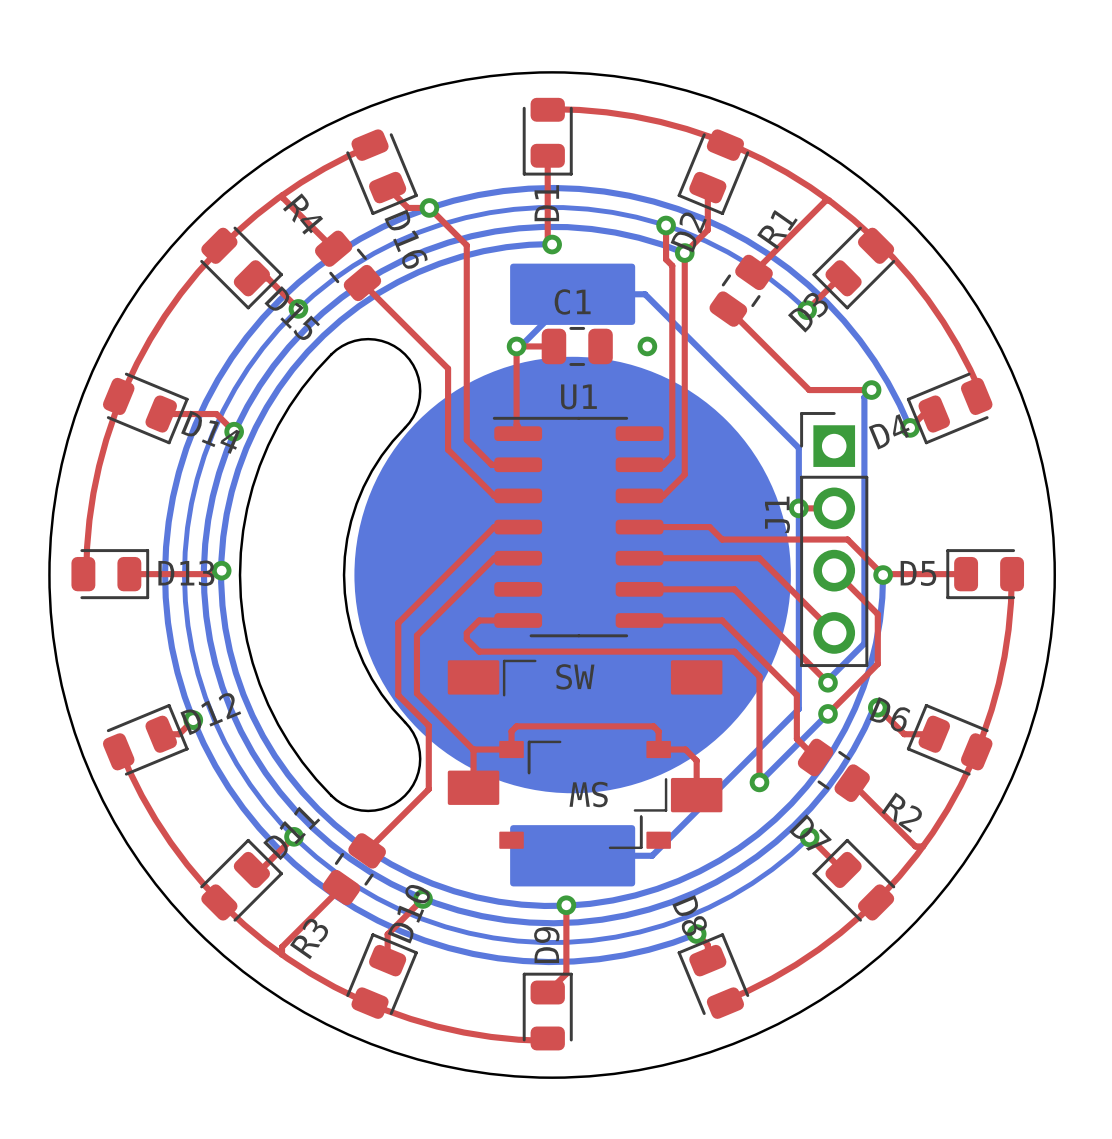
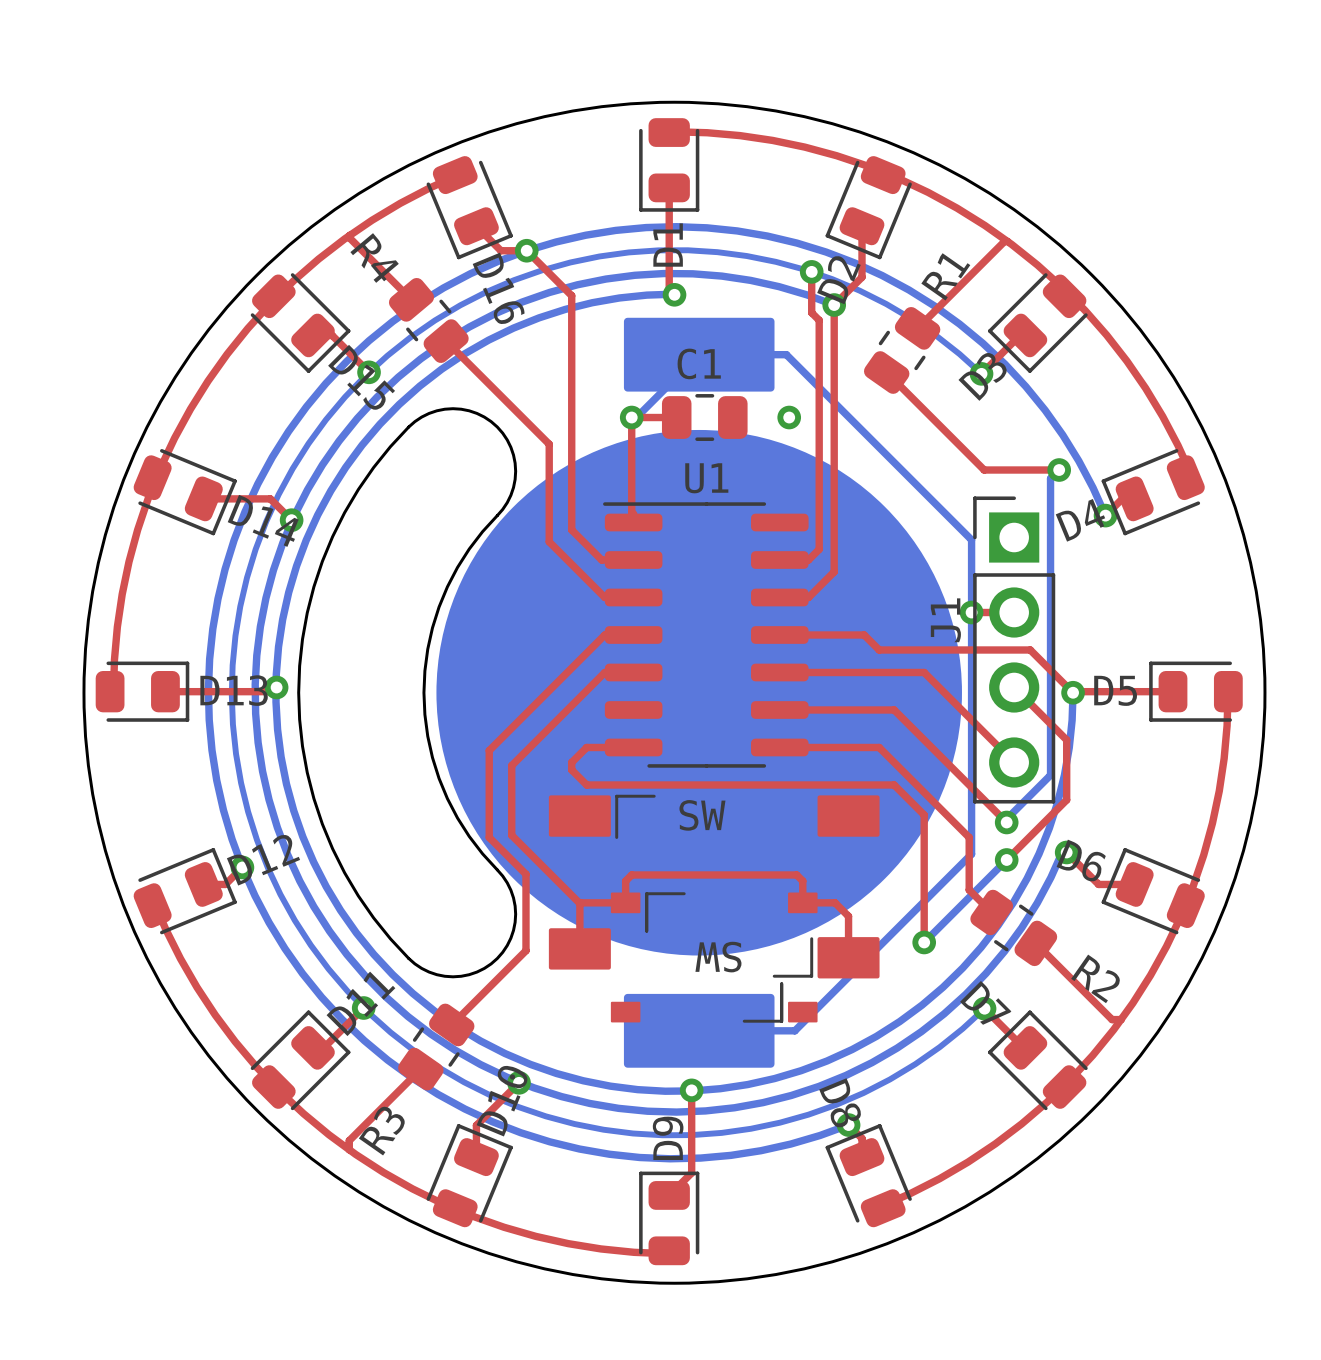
round board edge size: [48, 71, 1056, 1079] -> [82, 100, 1267, 1285]

